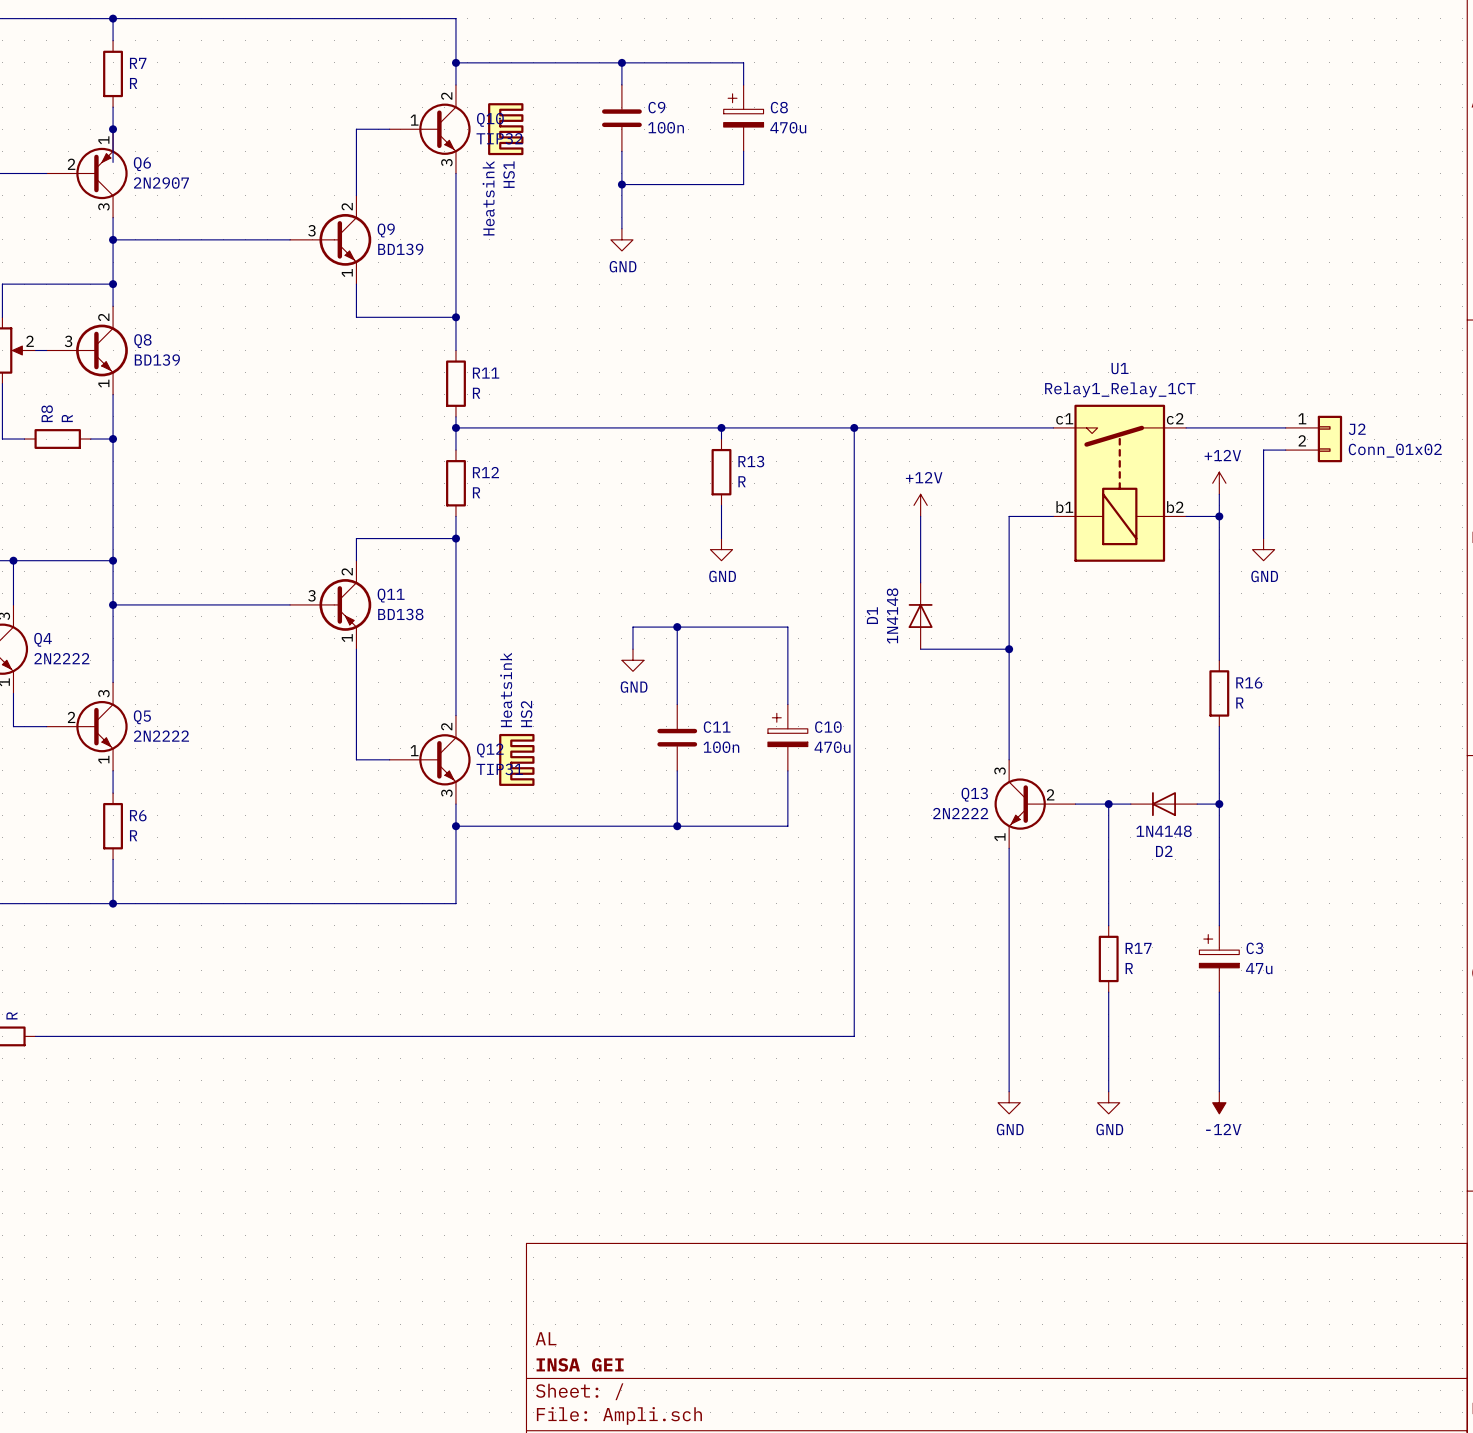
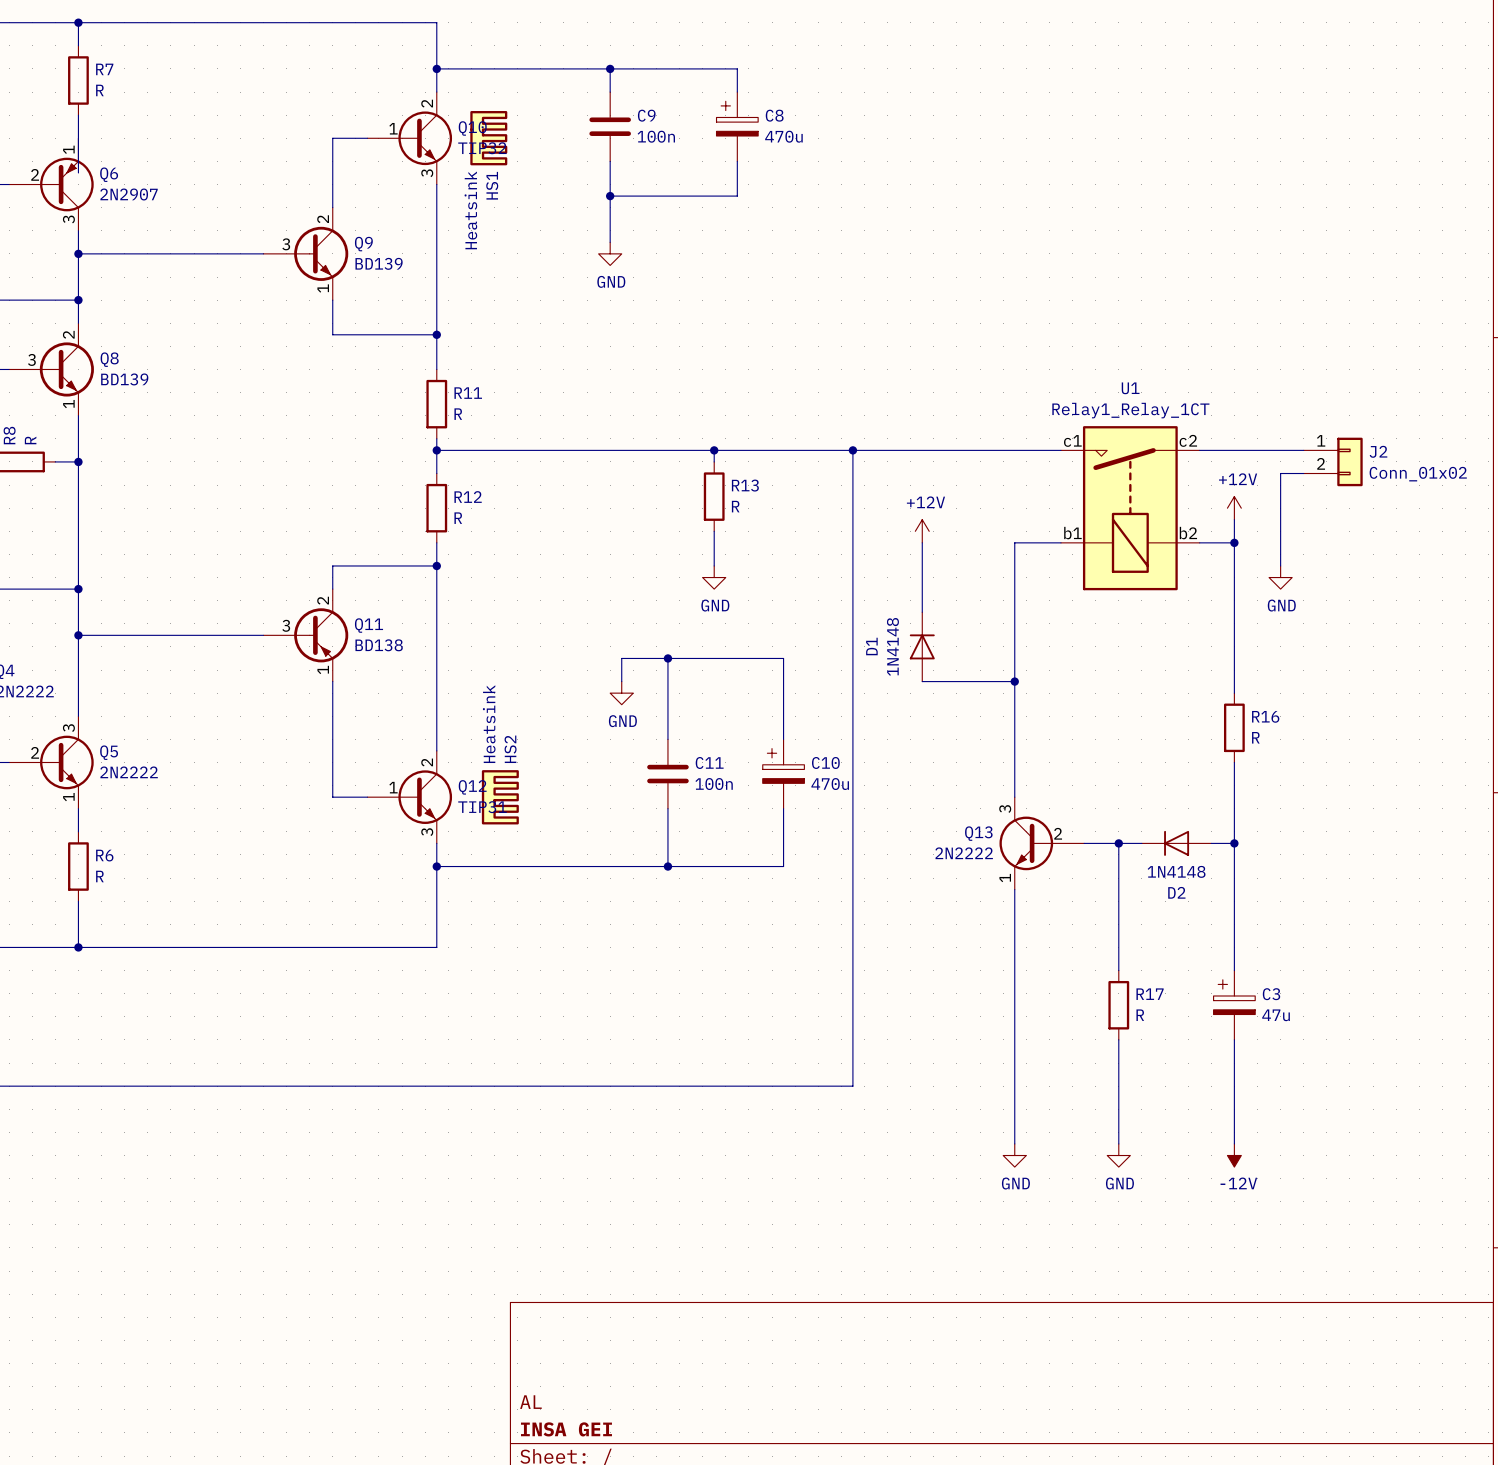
junction: (113, 129) -> none

